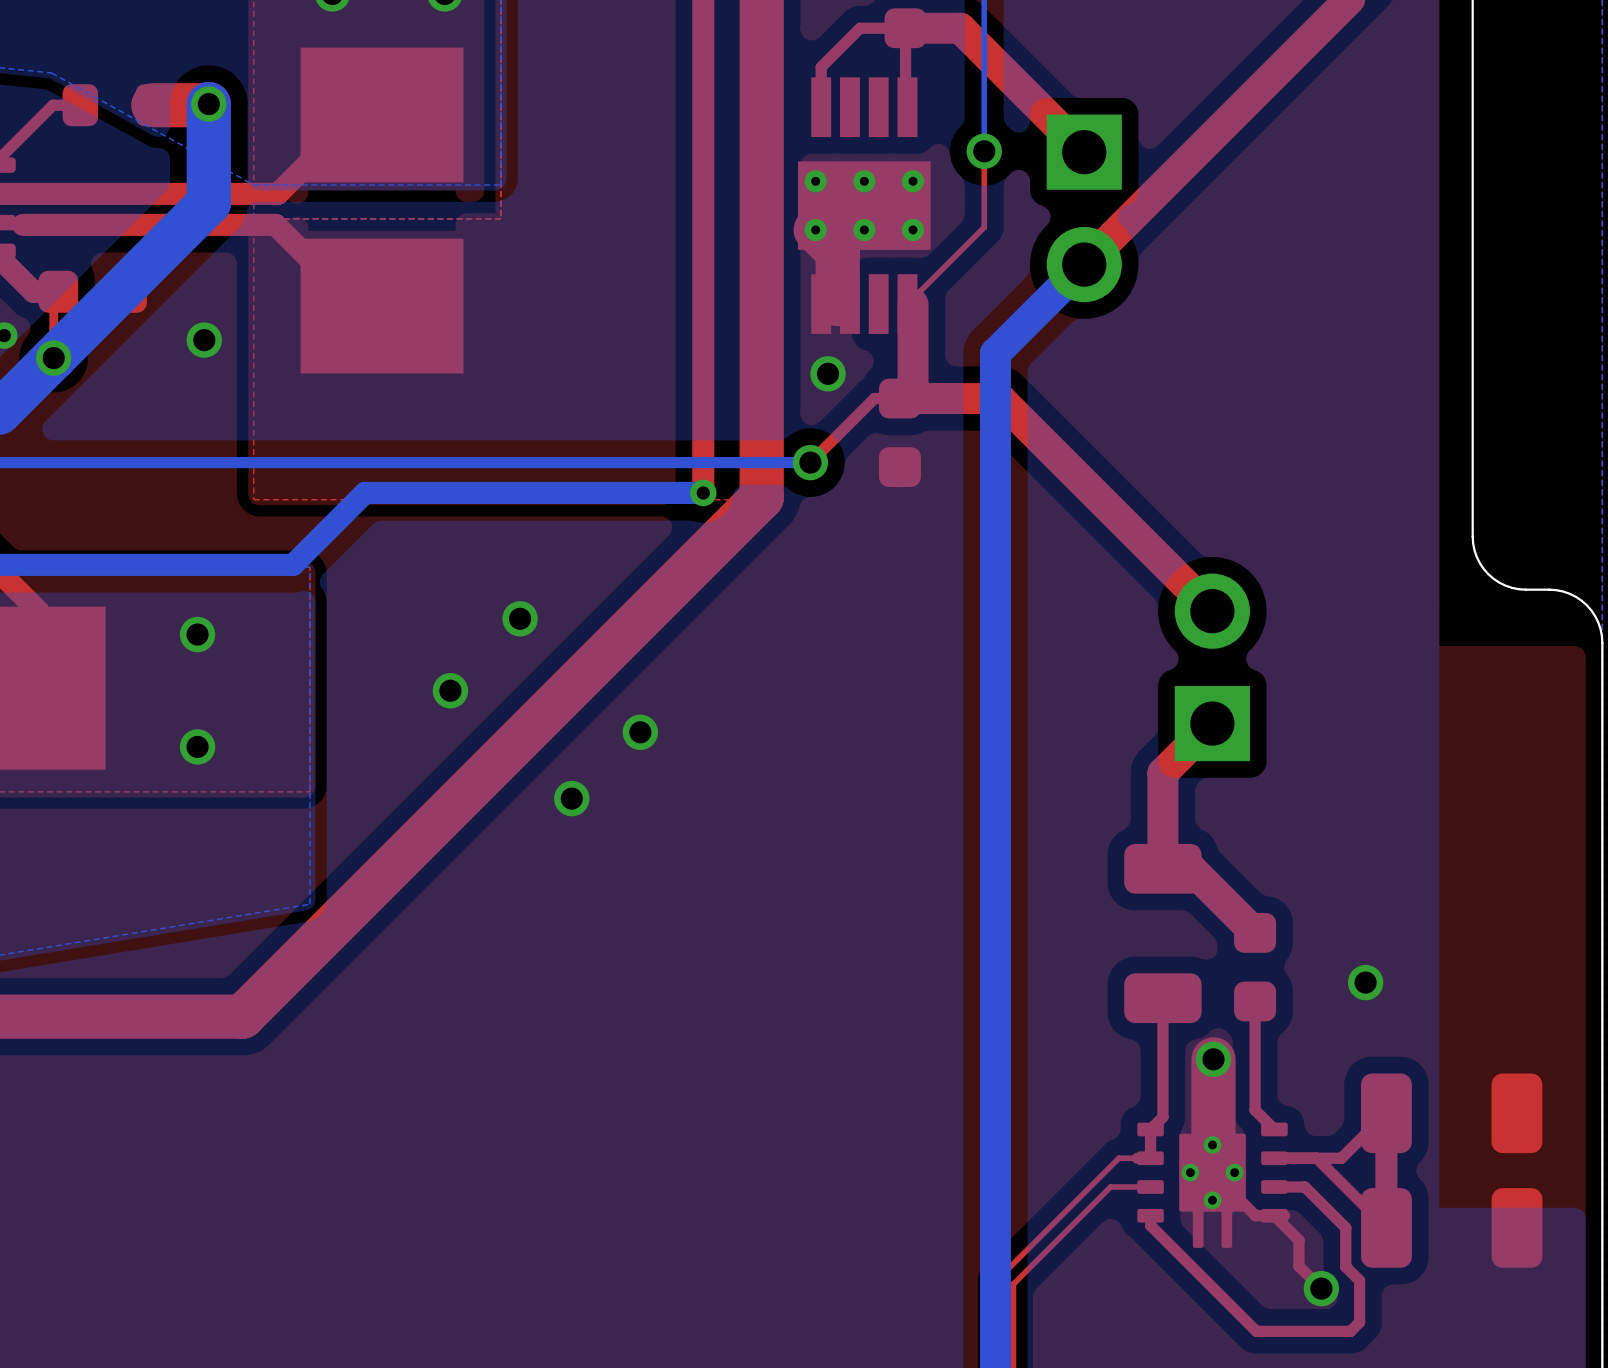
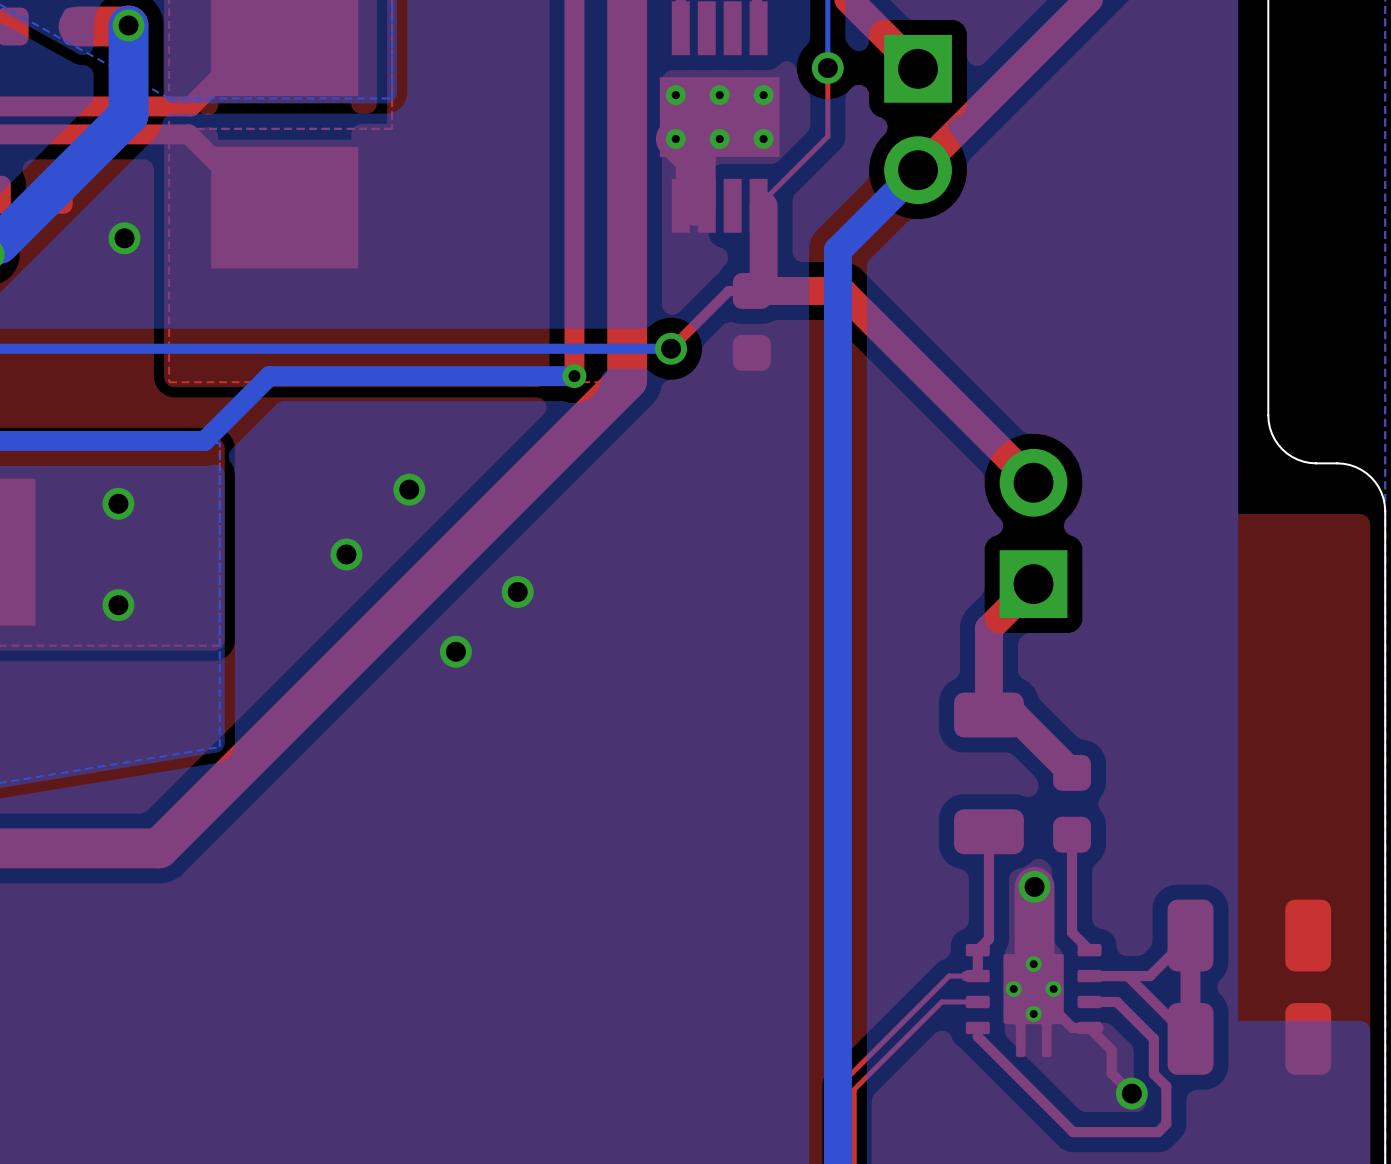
via: (828, 373) -> none
via: (1365, 982) -> none

